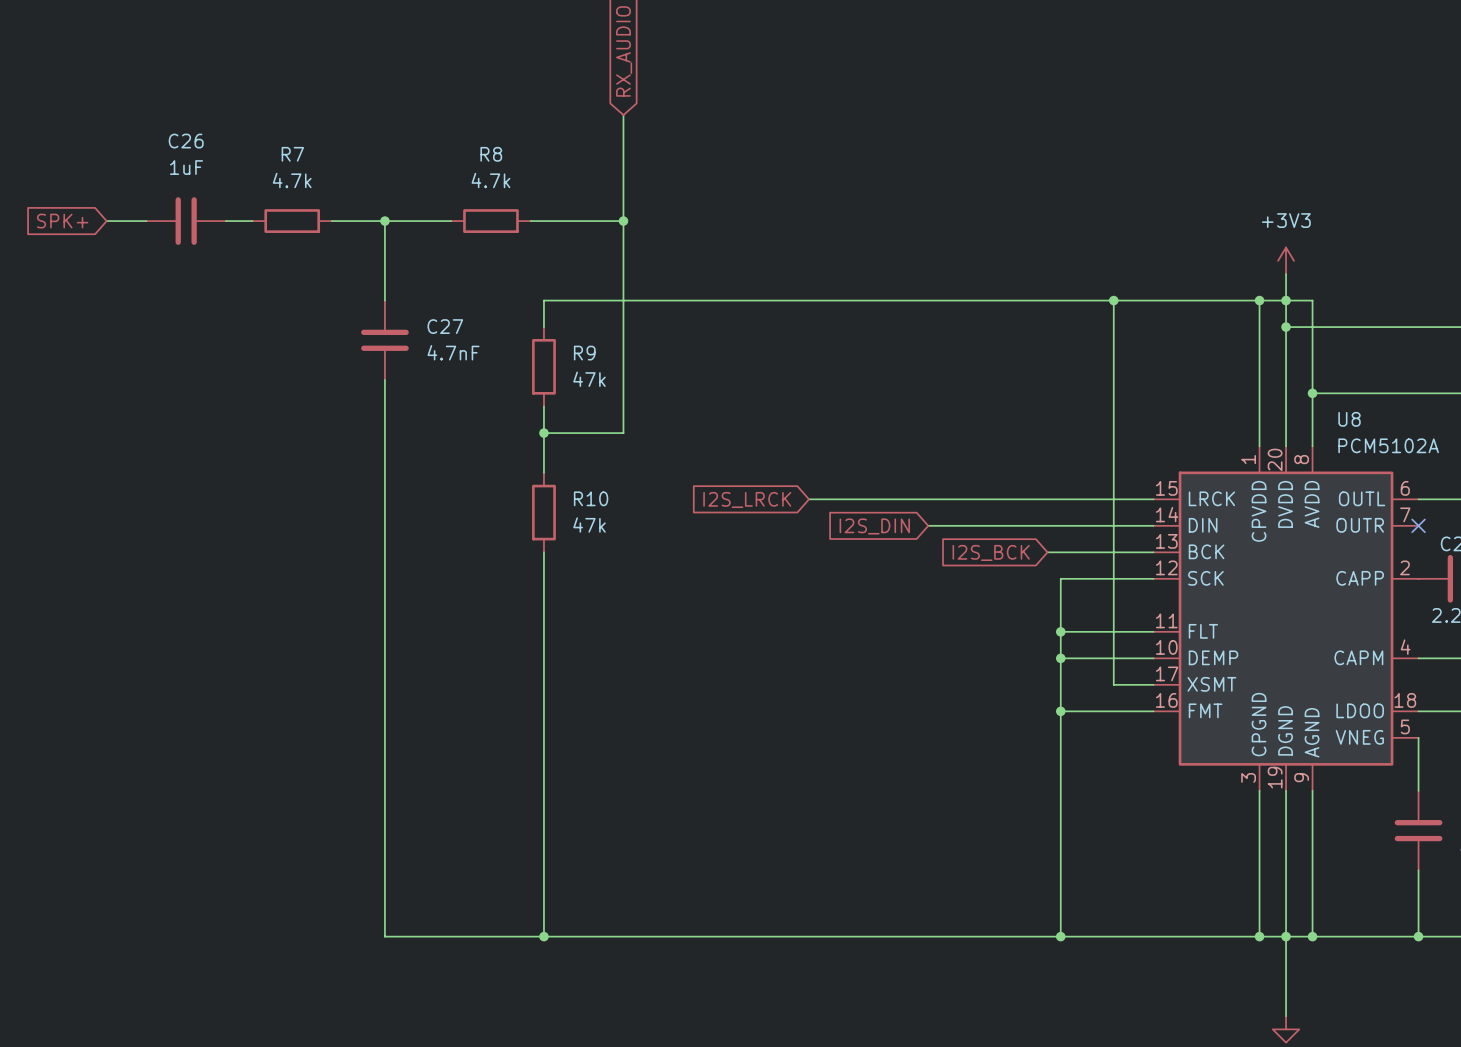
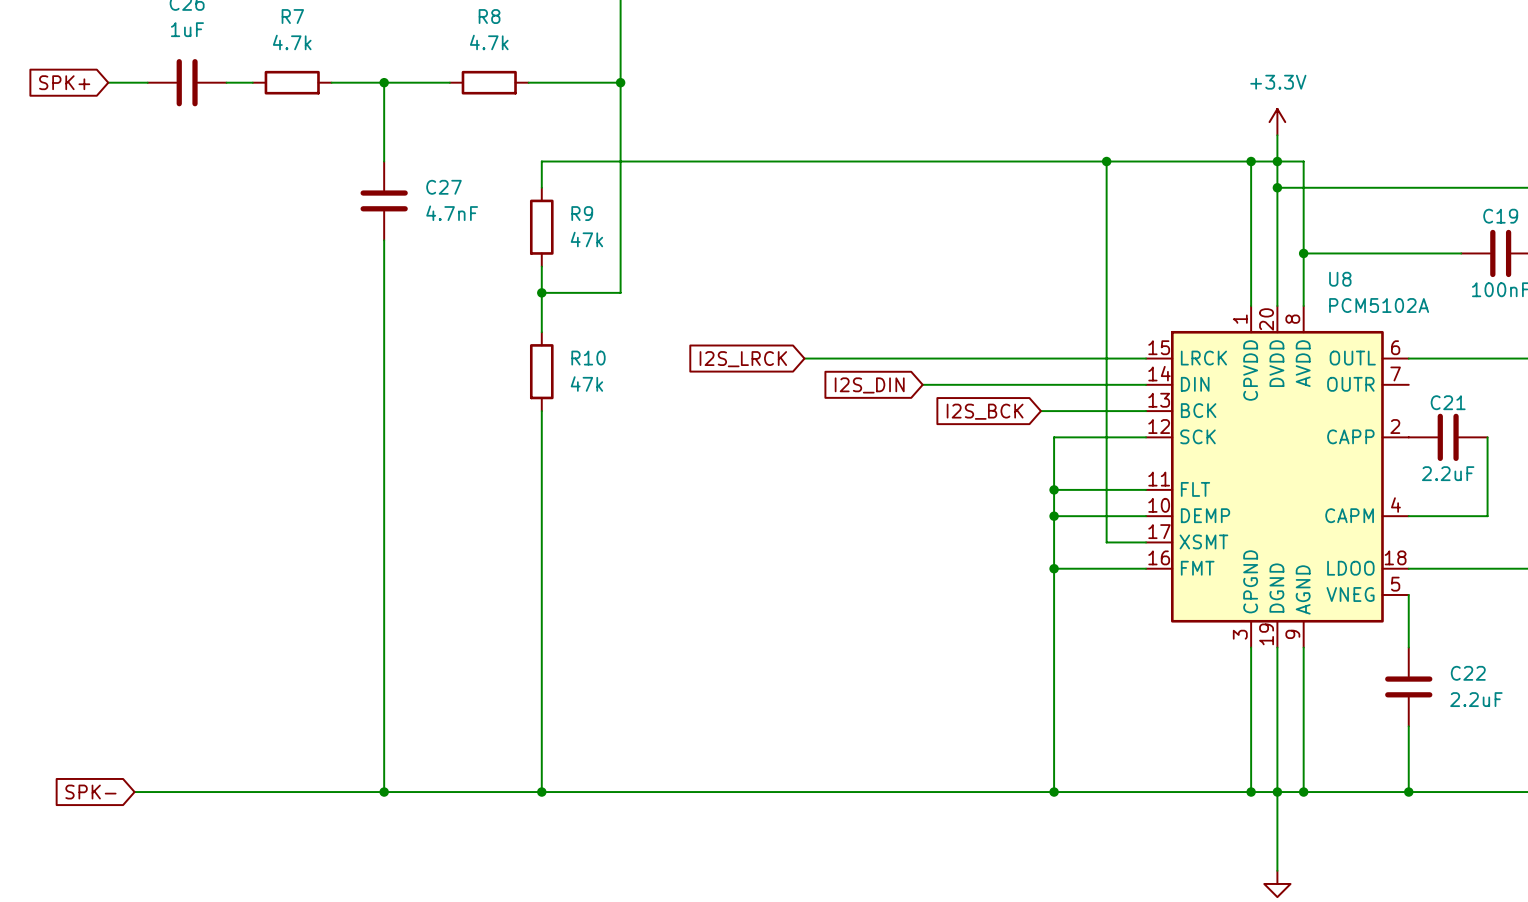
power symbol: +3V3 (1286, 260) -> +3.3V (1277, 122)
no-connect mark: (1418, 525) -> none
global label: none -> SPK- (90, 792)
wire: none -> (134, 792) (384, 792)
junction: none -> (384, 792)

